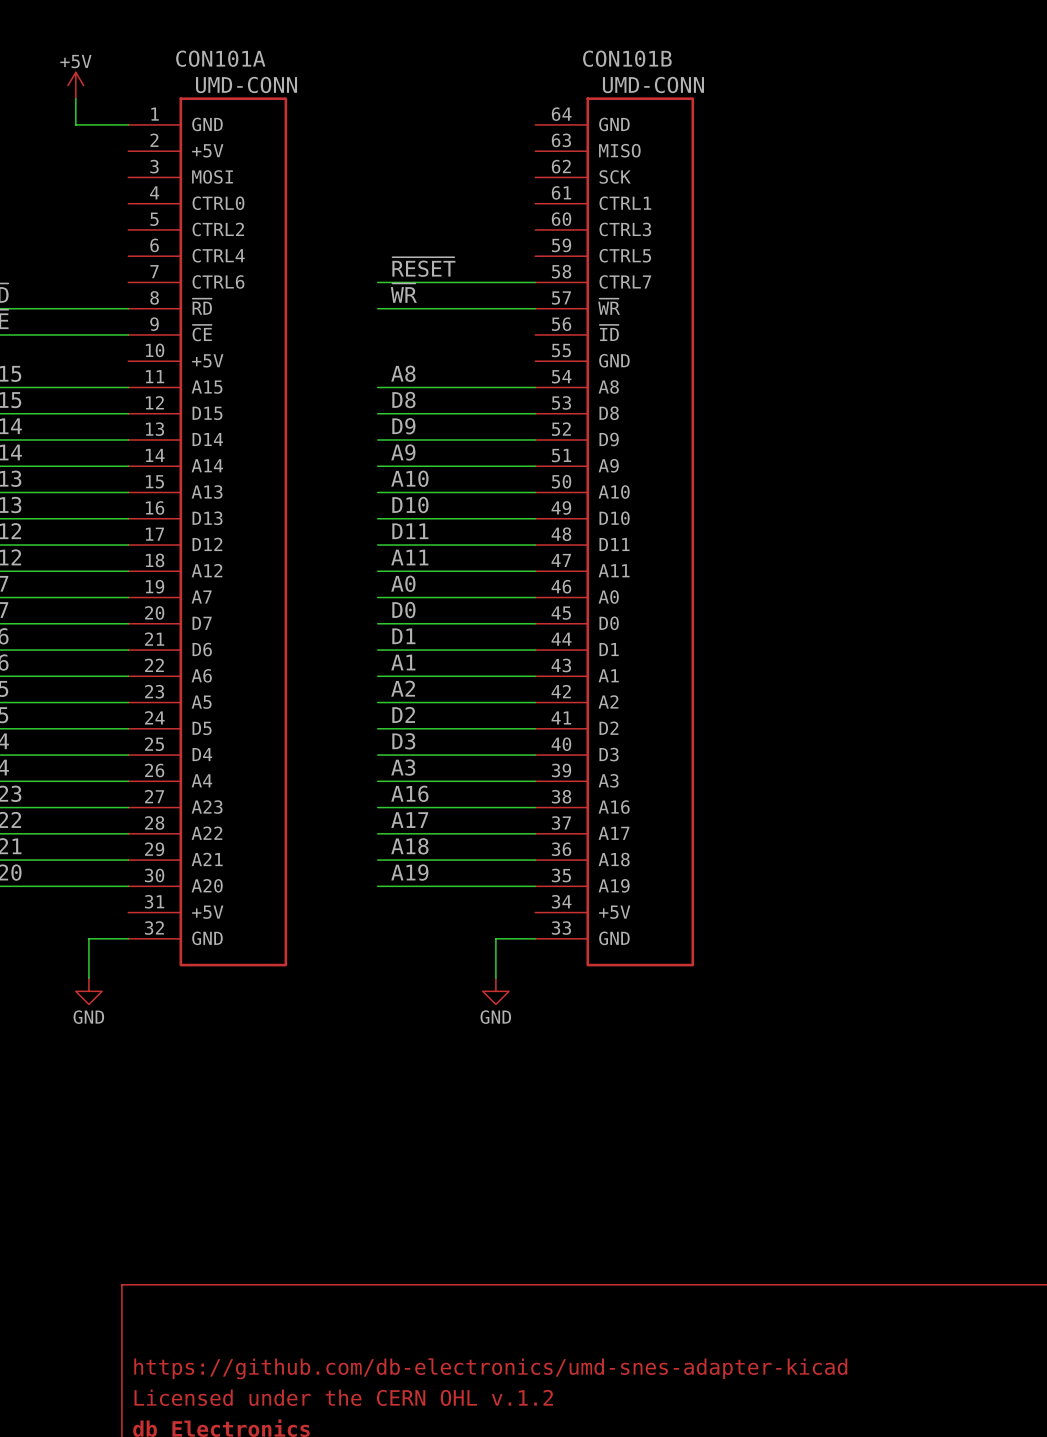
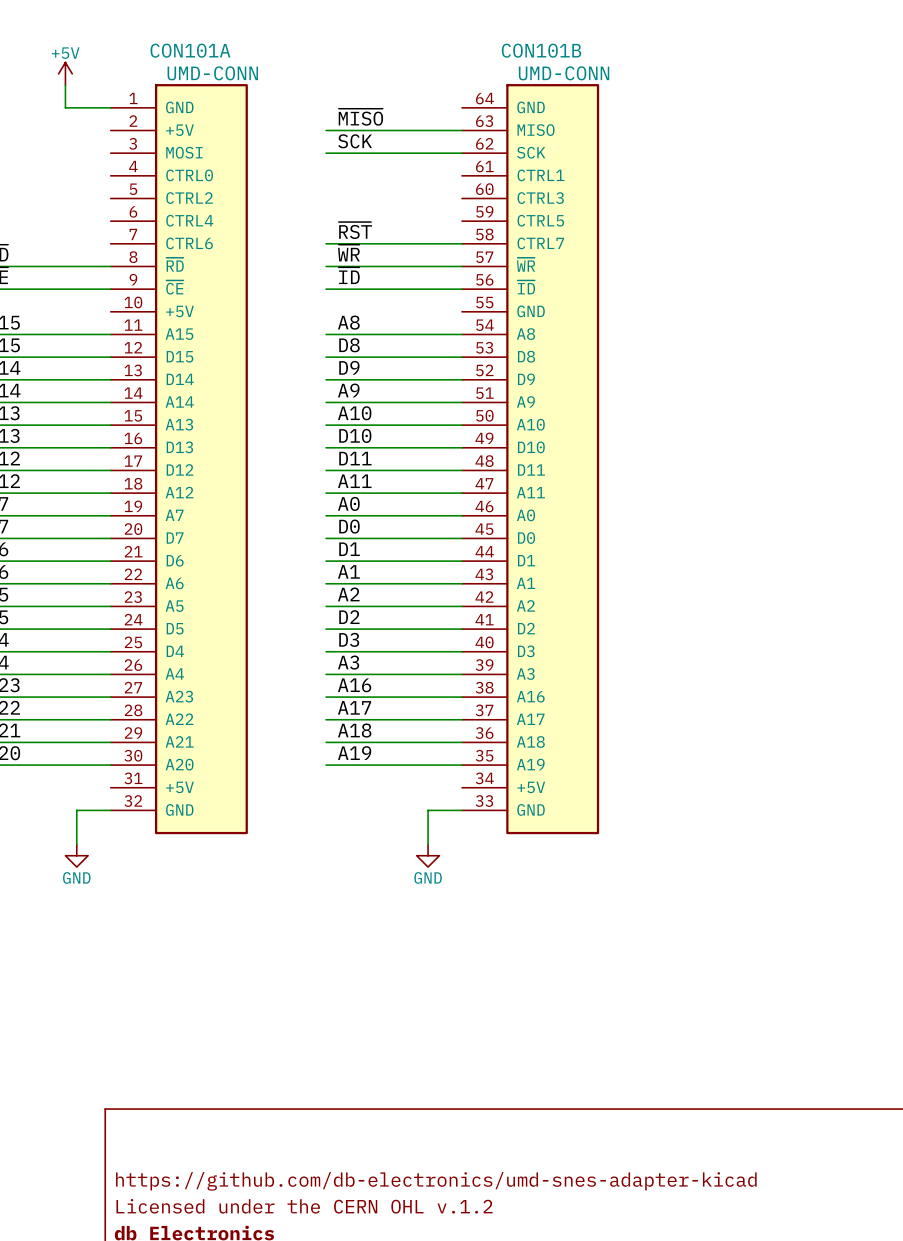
label: none -> ~{MISO} (360, 117)
wire: none -> (326, 130) (462, 130)
label: none -> SCK (355, 141)
wire: none -> (326, 153) (462, 153)
label: ~{RESET} (423, 267) -> ~{RST} (355, 230)
label: none -> ~{ID} (349, 275)
wire: none -> (326, 289) (462, 289)

